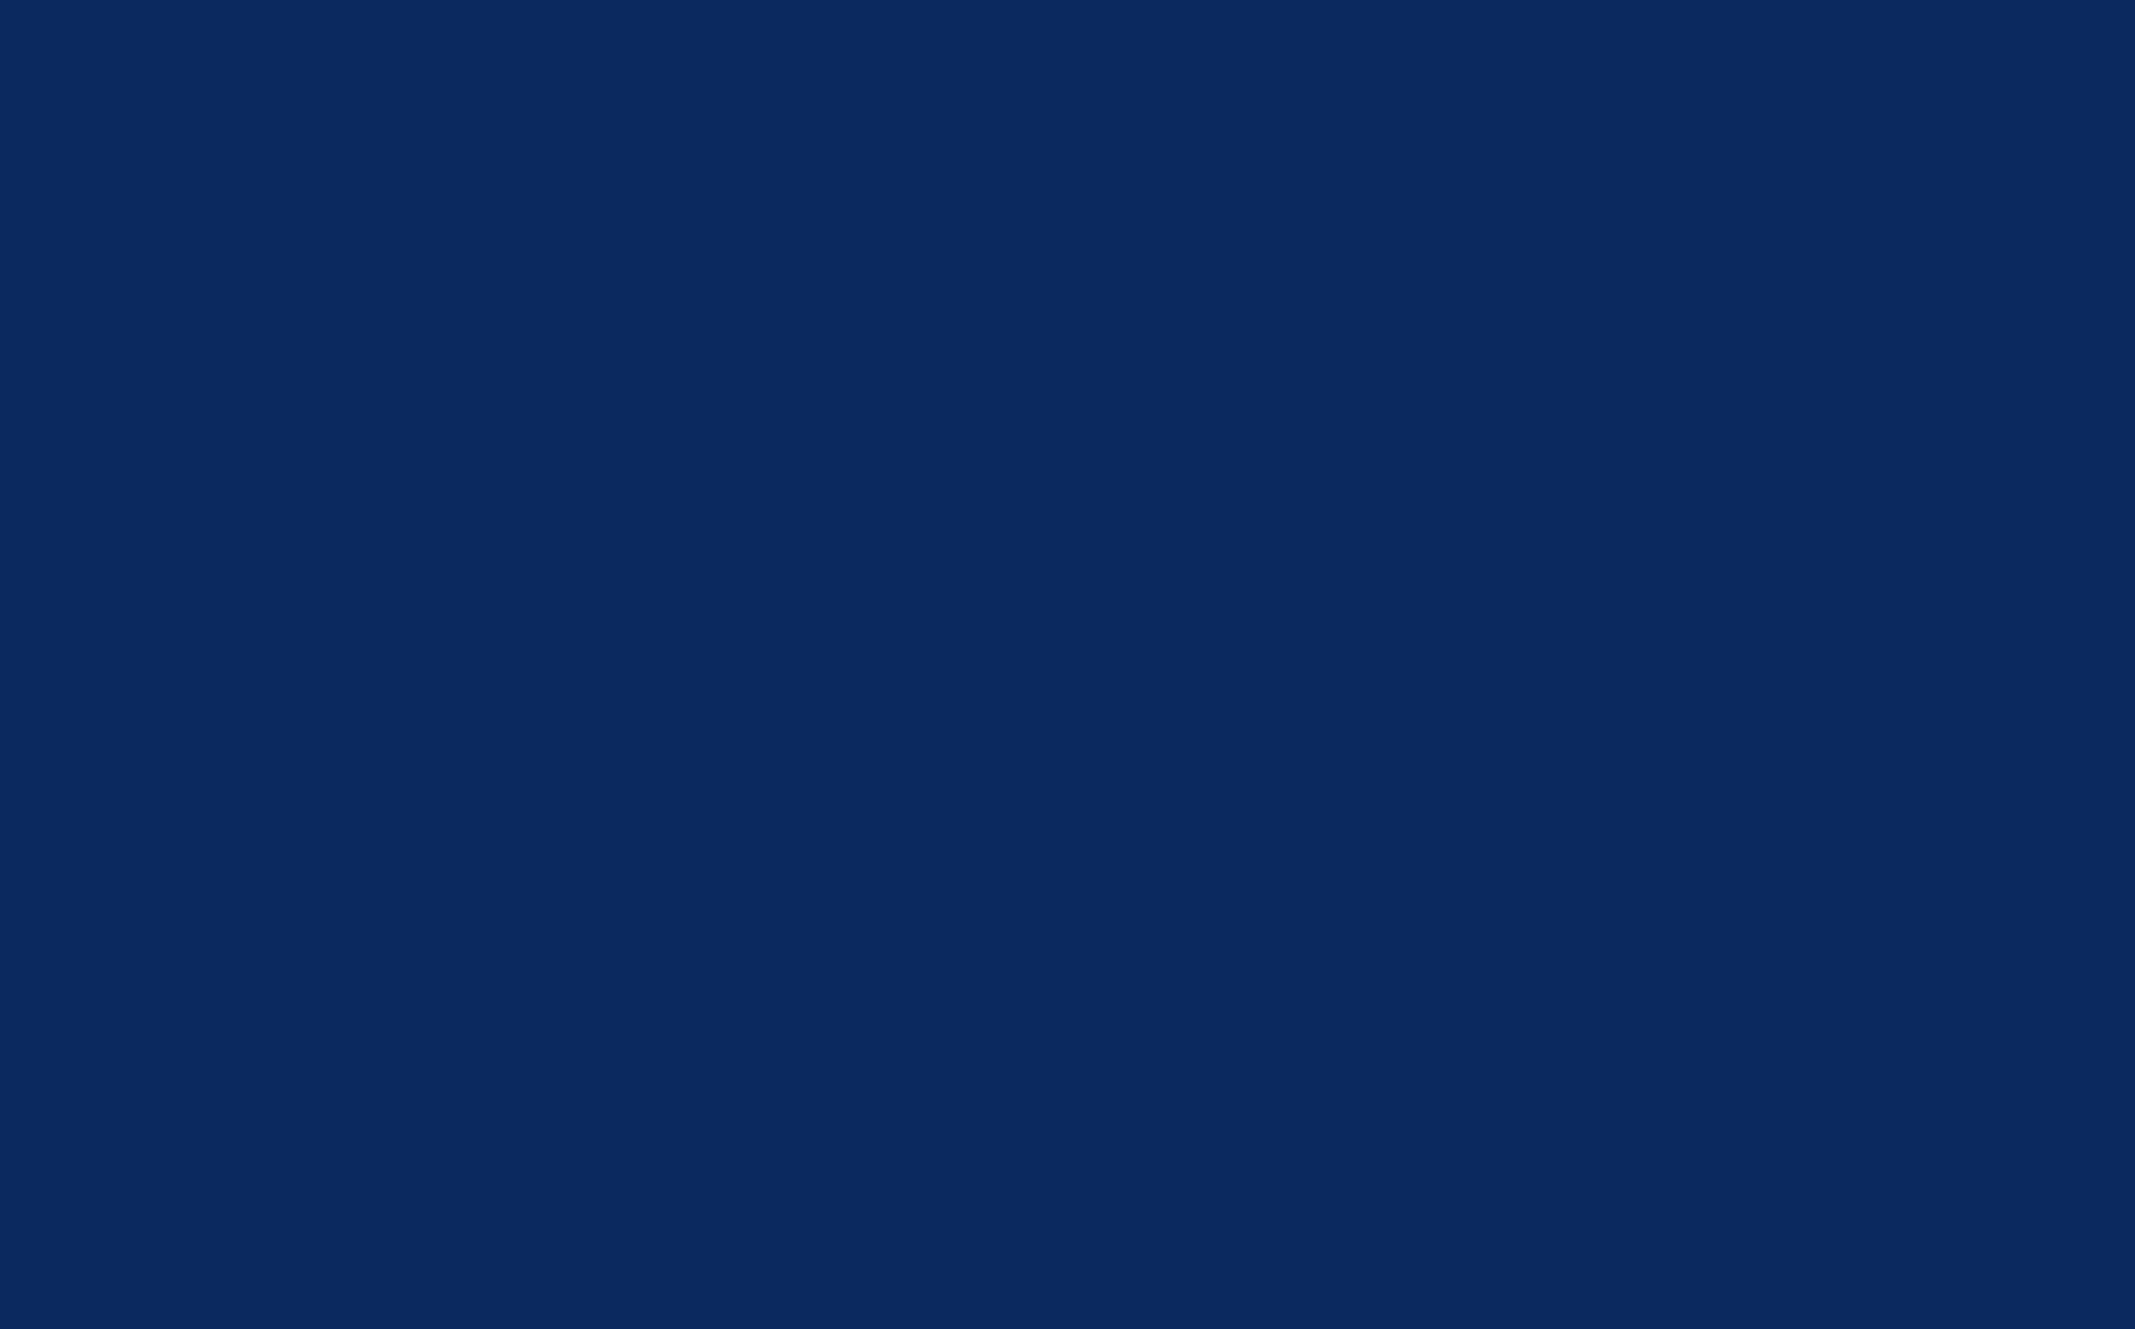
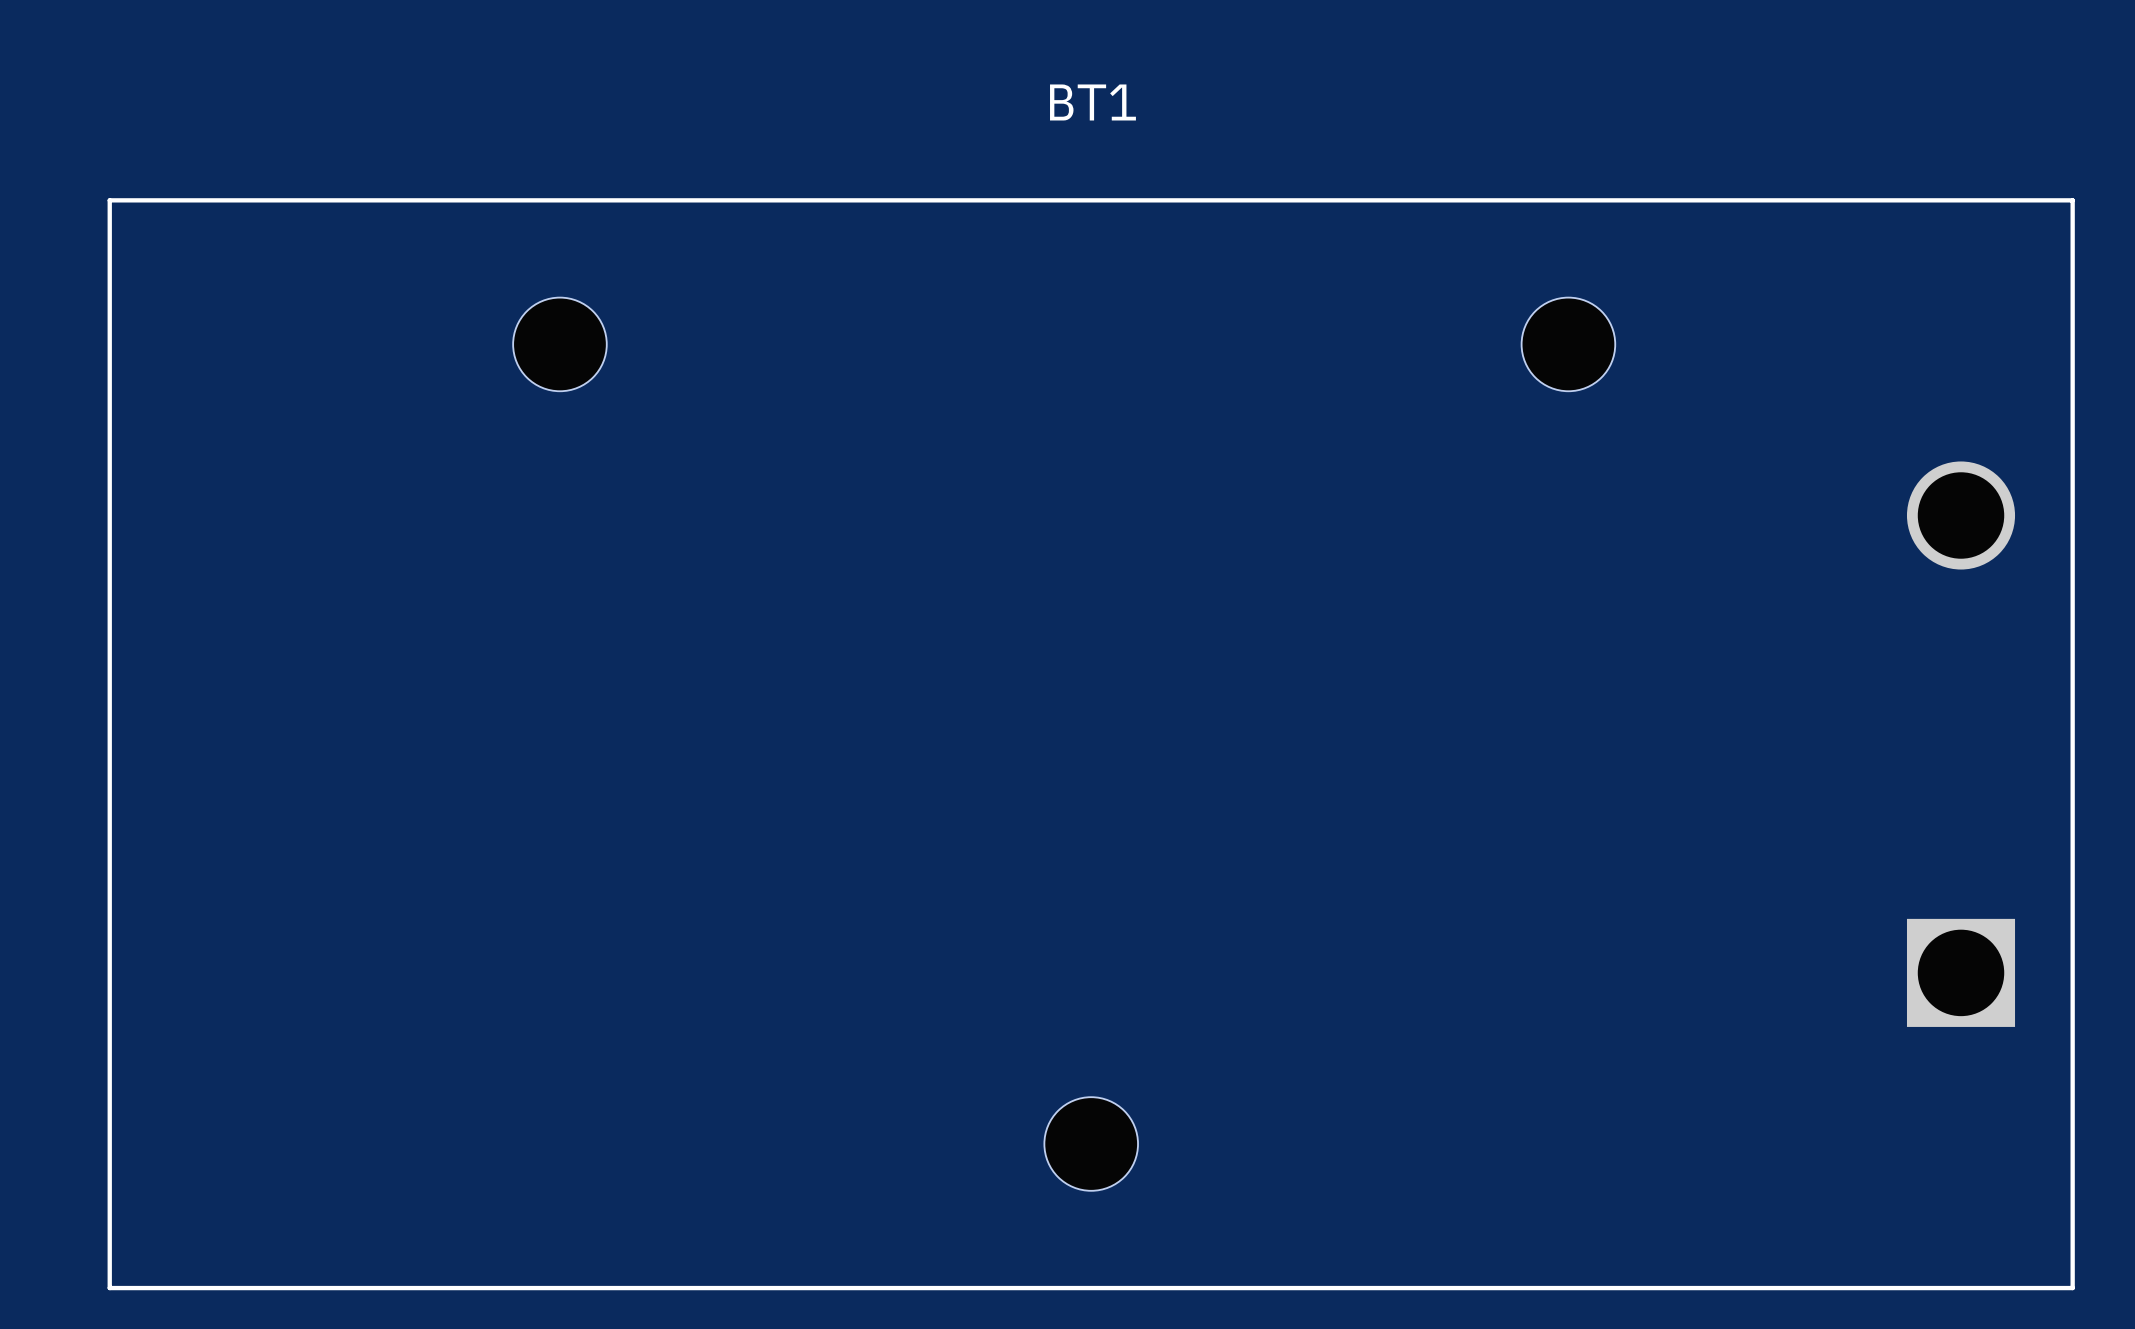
BT1: none -> (1091, 744)

